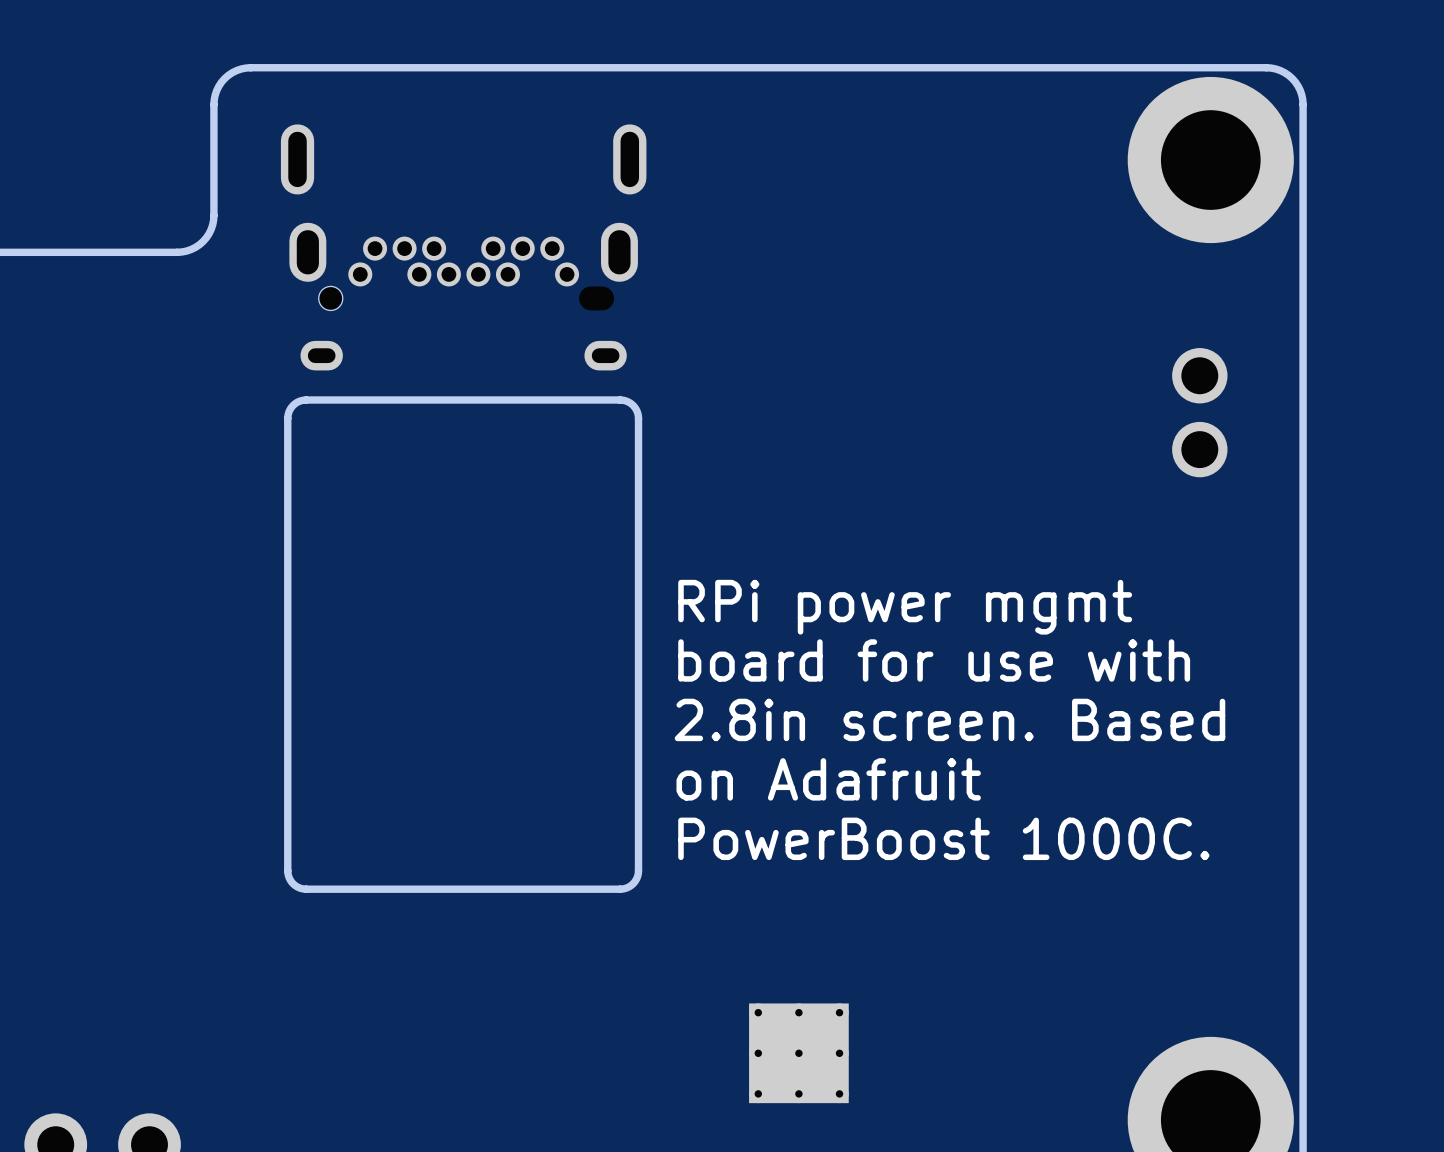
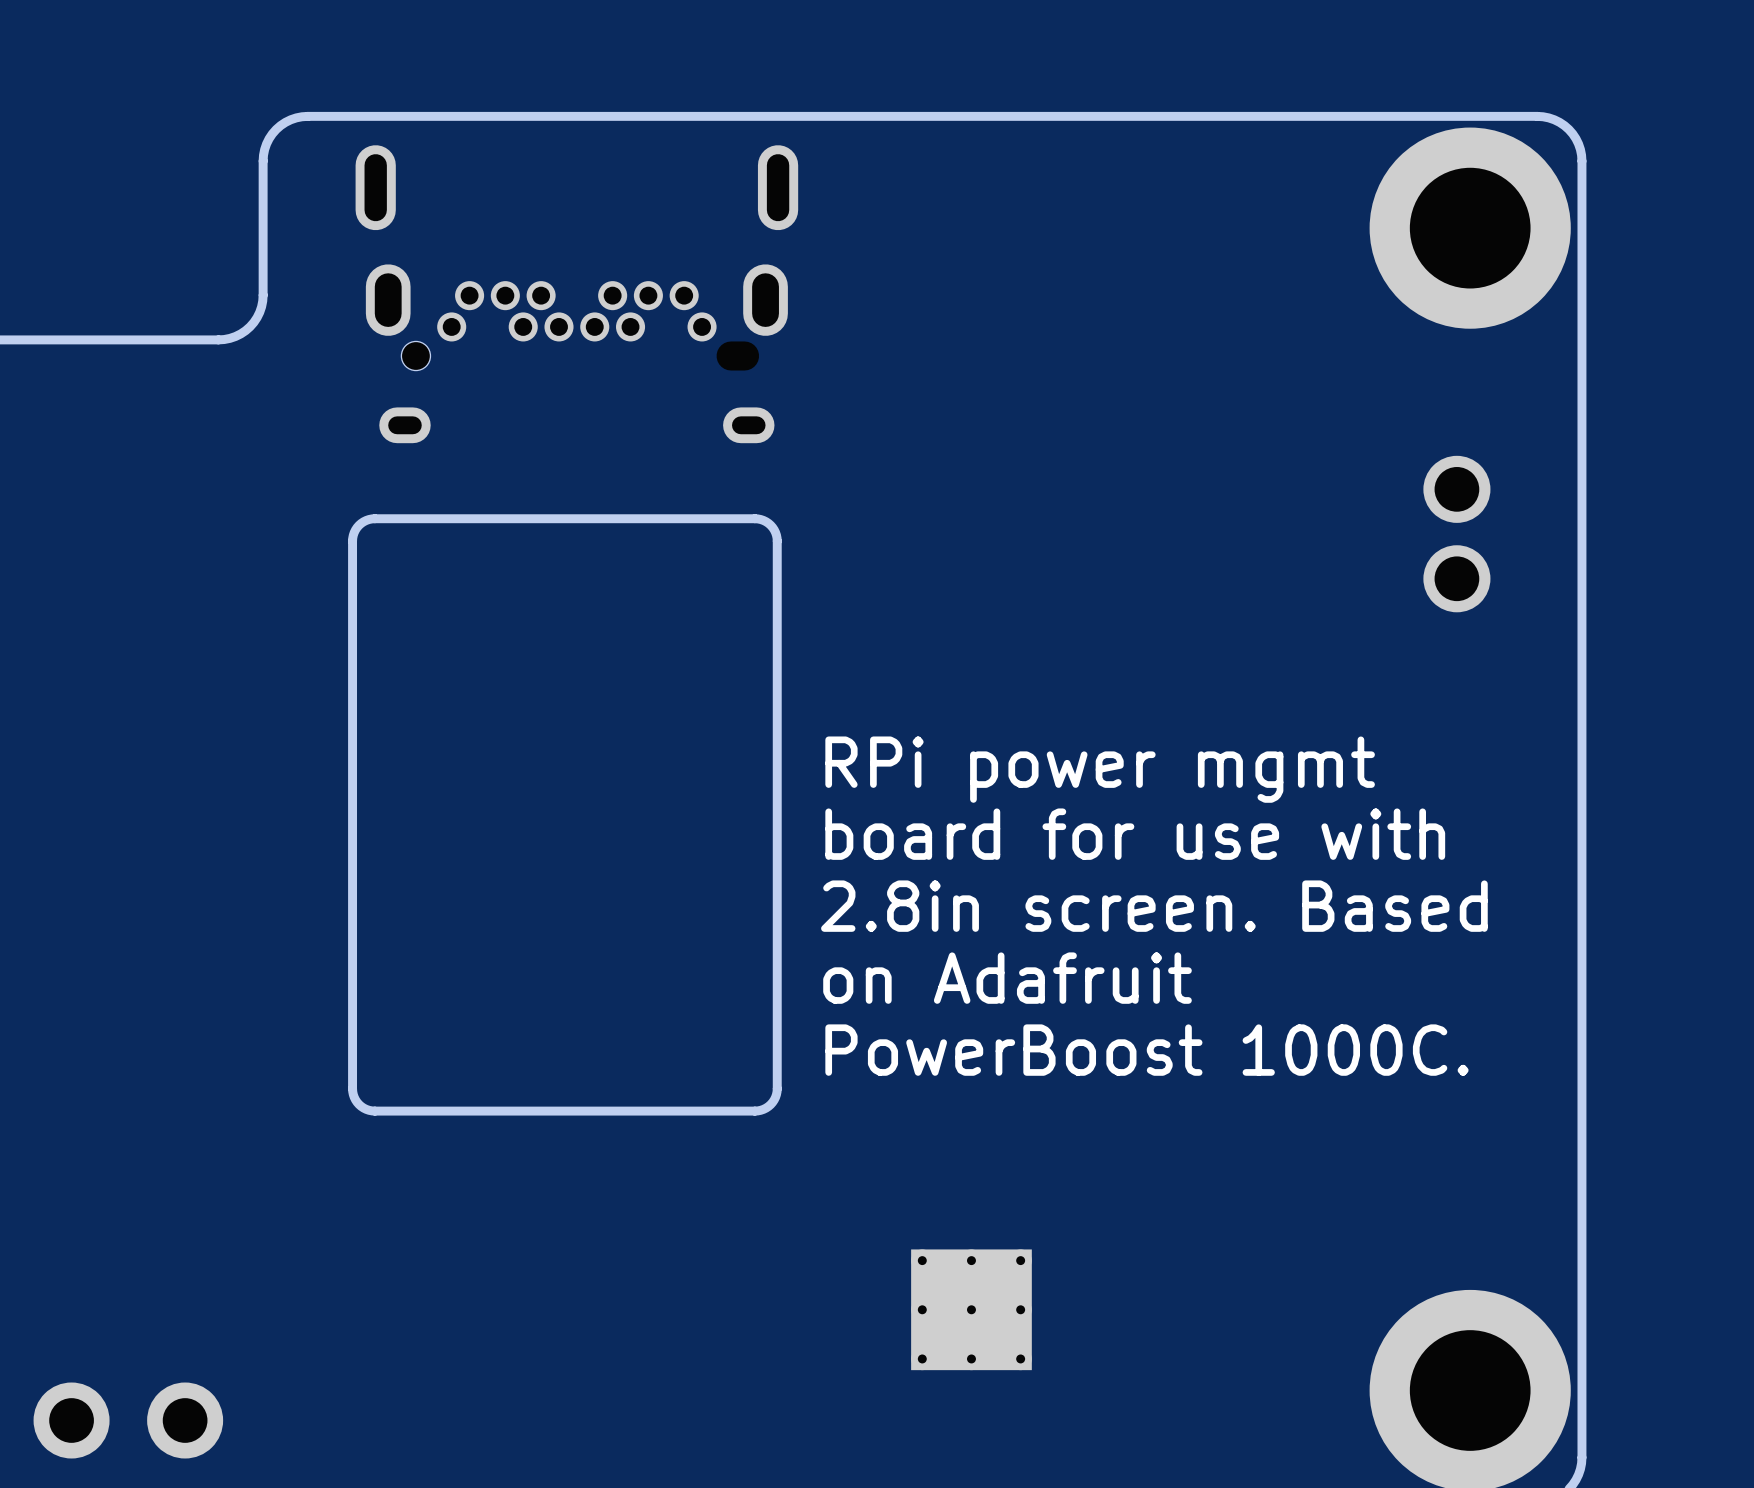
part position: (463, 247) -> (576, 294)

